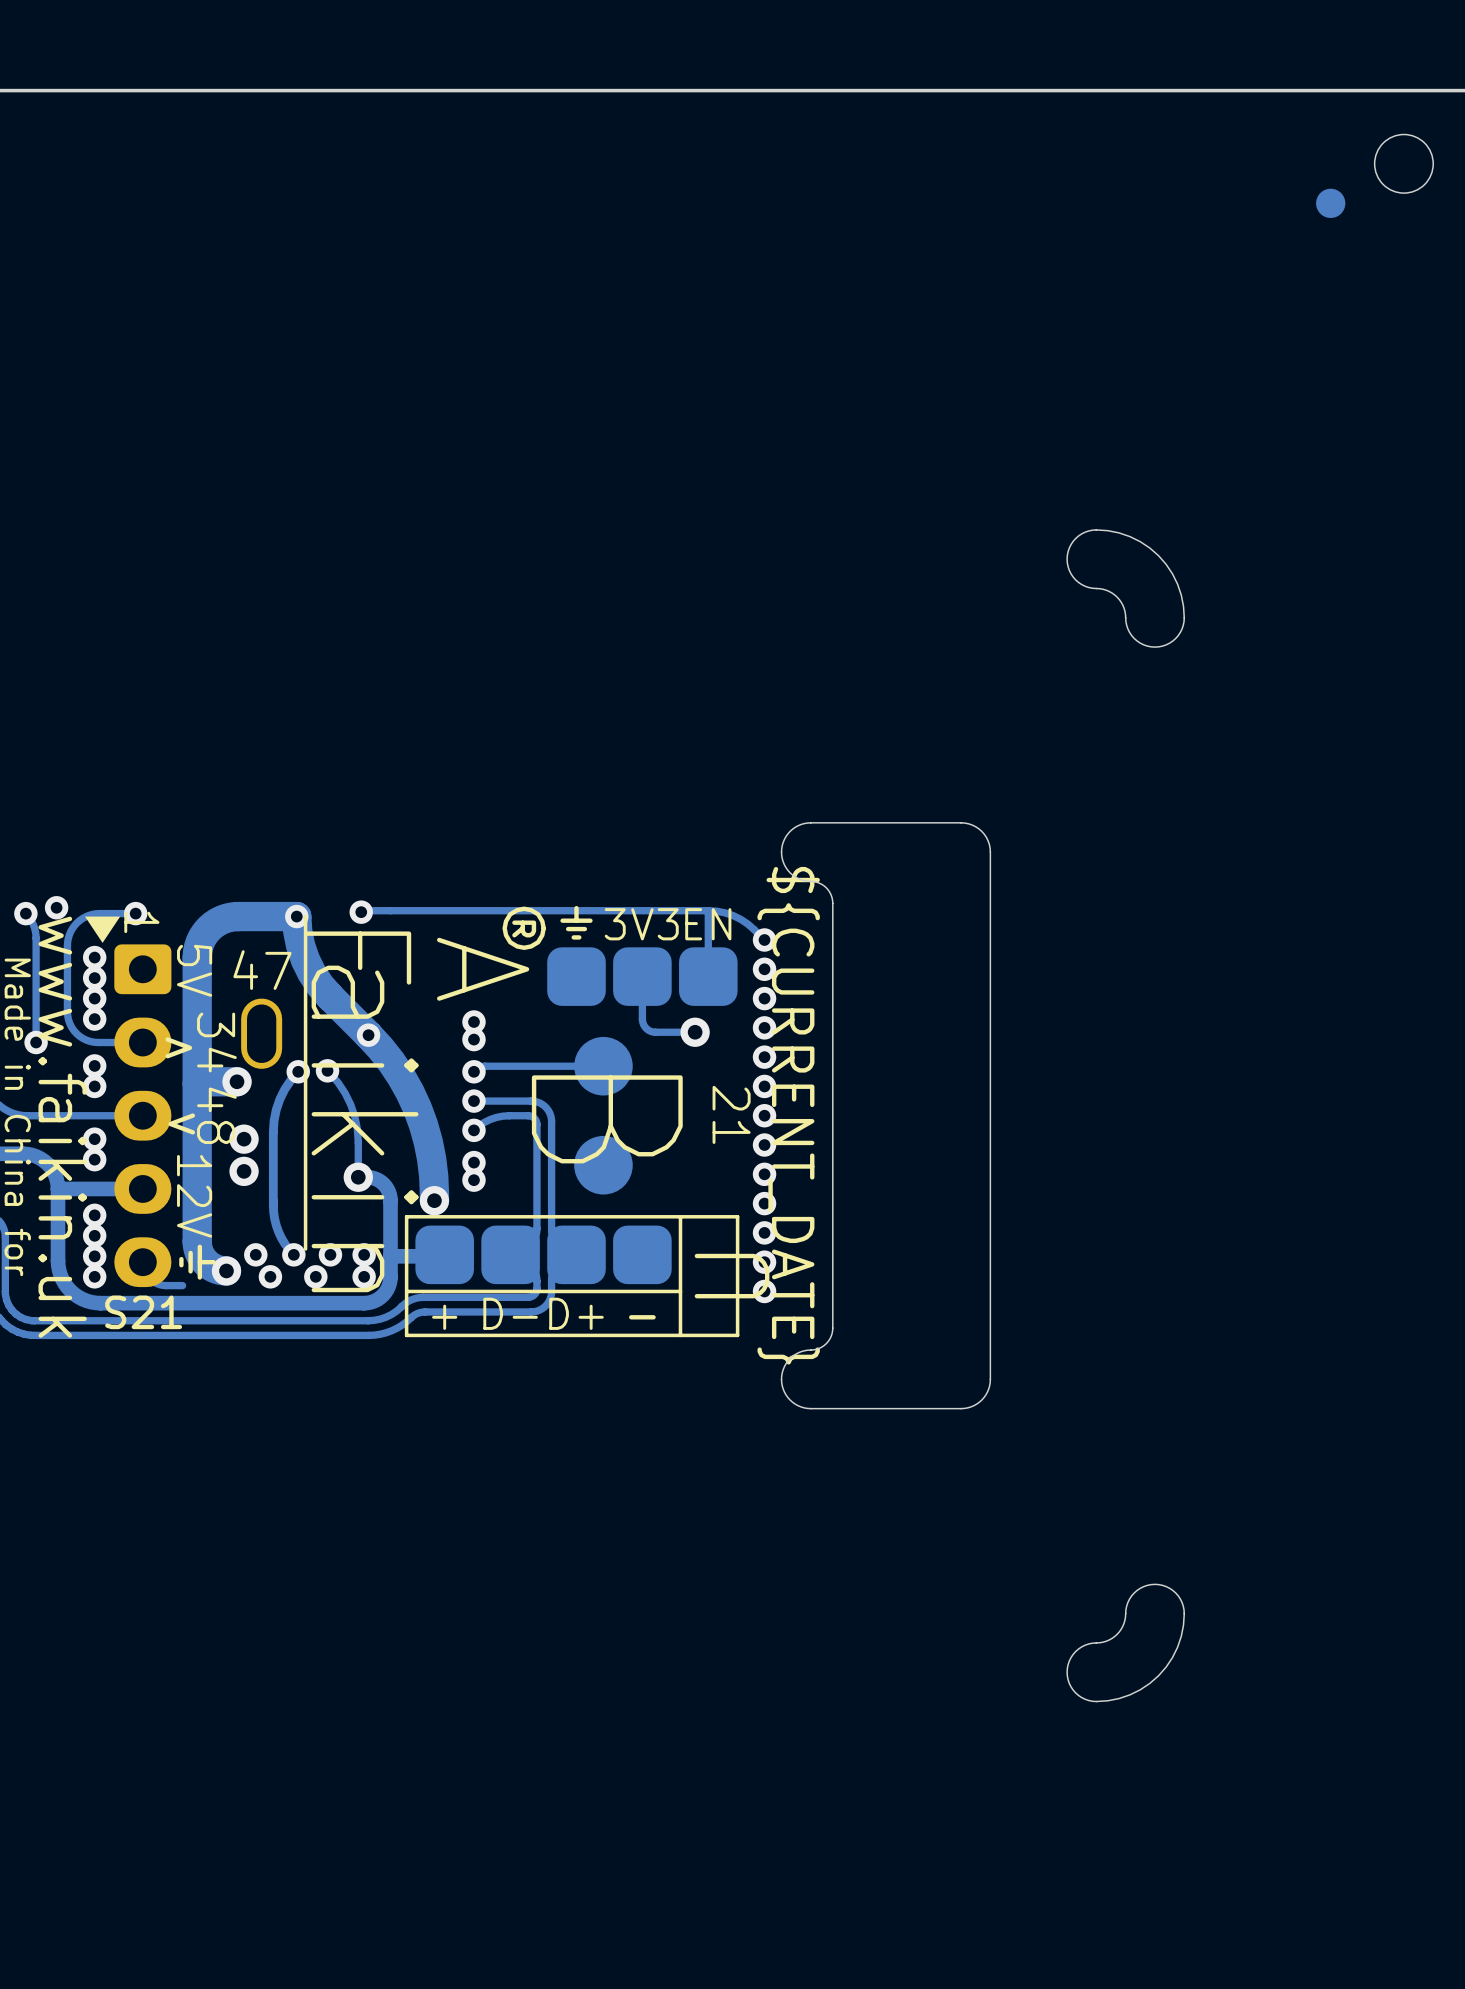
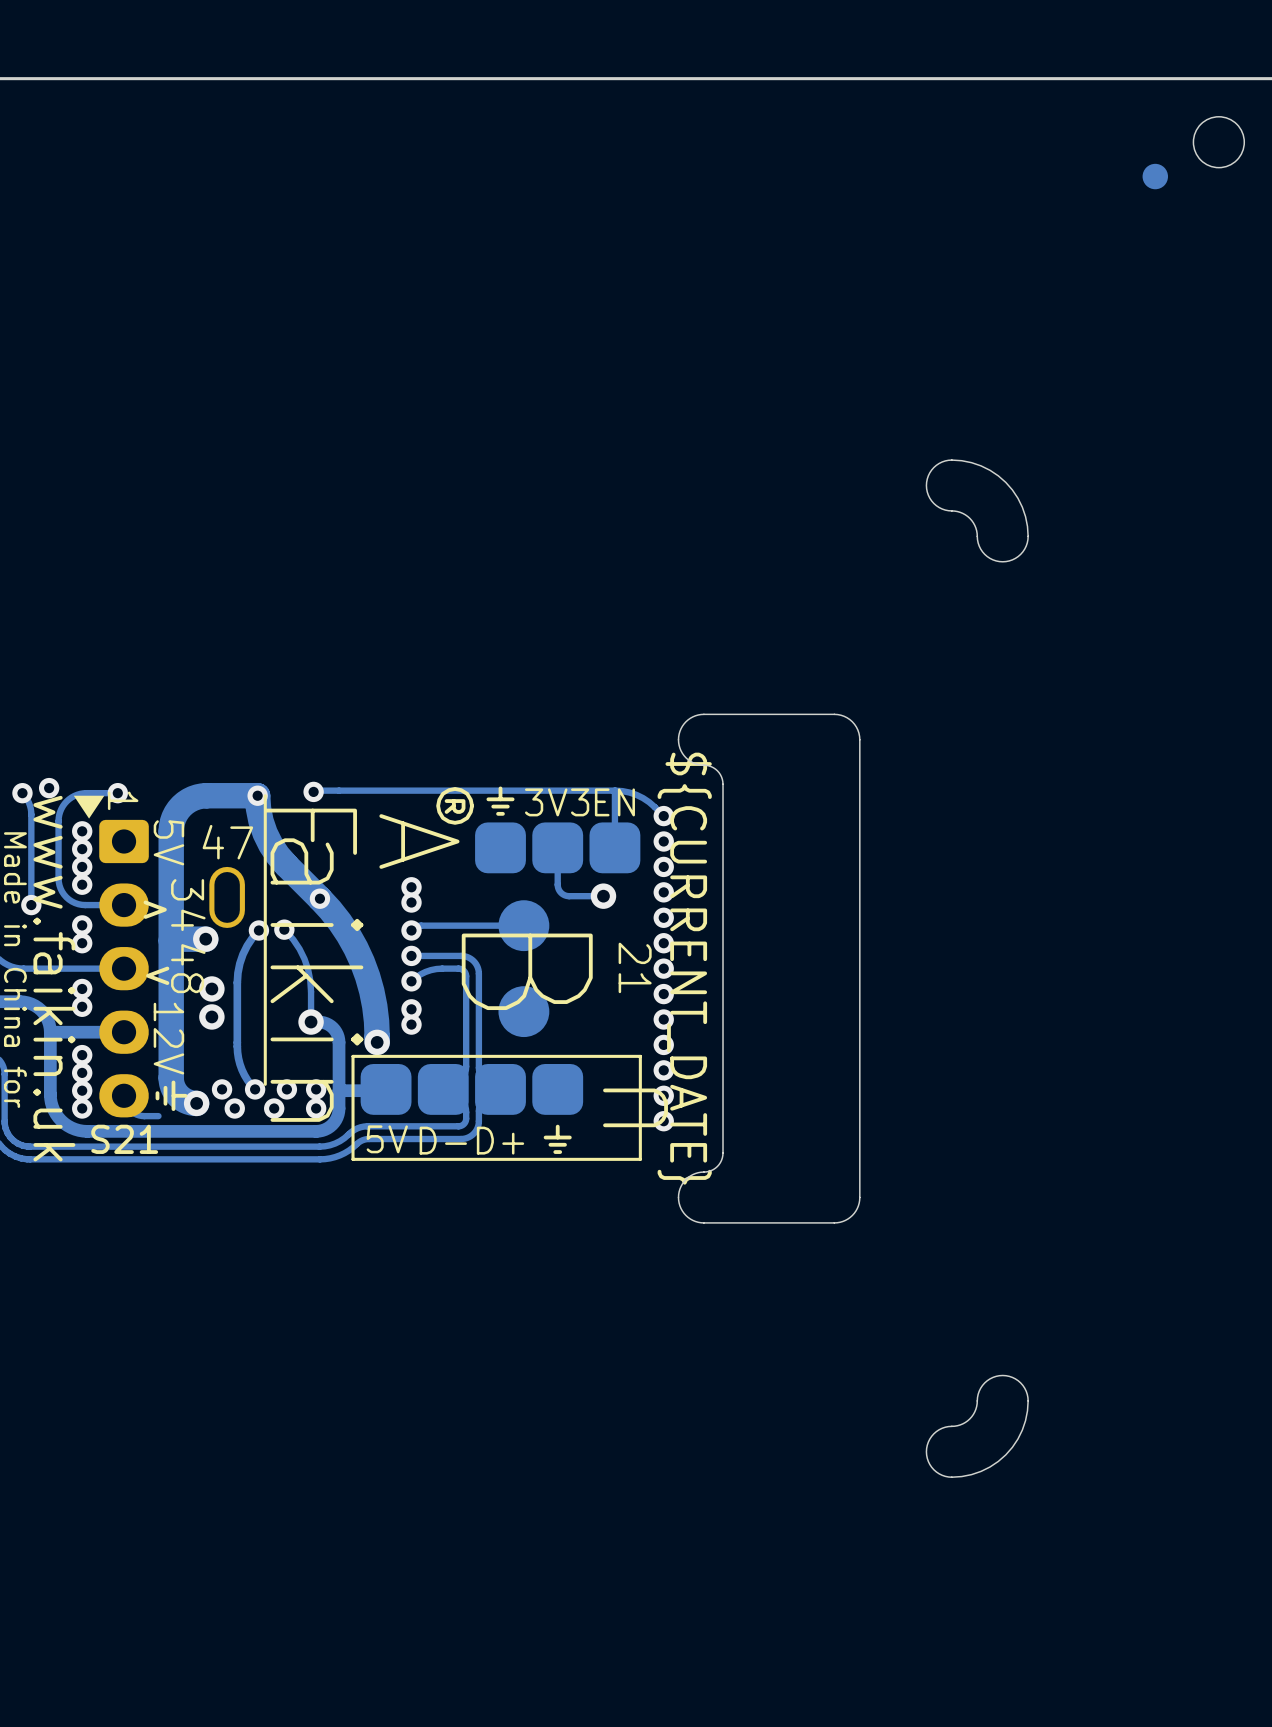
line: (680, 1218) (680, 1335) -> none
line: (680, 1291) (408, 1291) -> none
text: + (444, 1317) -> 5V (387, 1139)
text: - (642, 1317) -> ⏚ (557, 1139)

